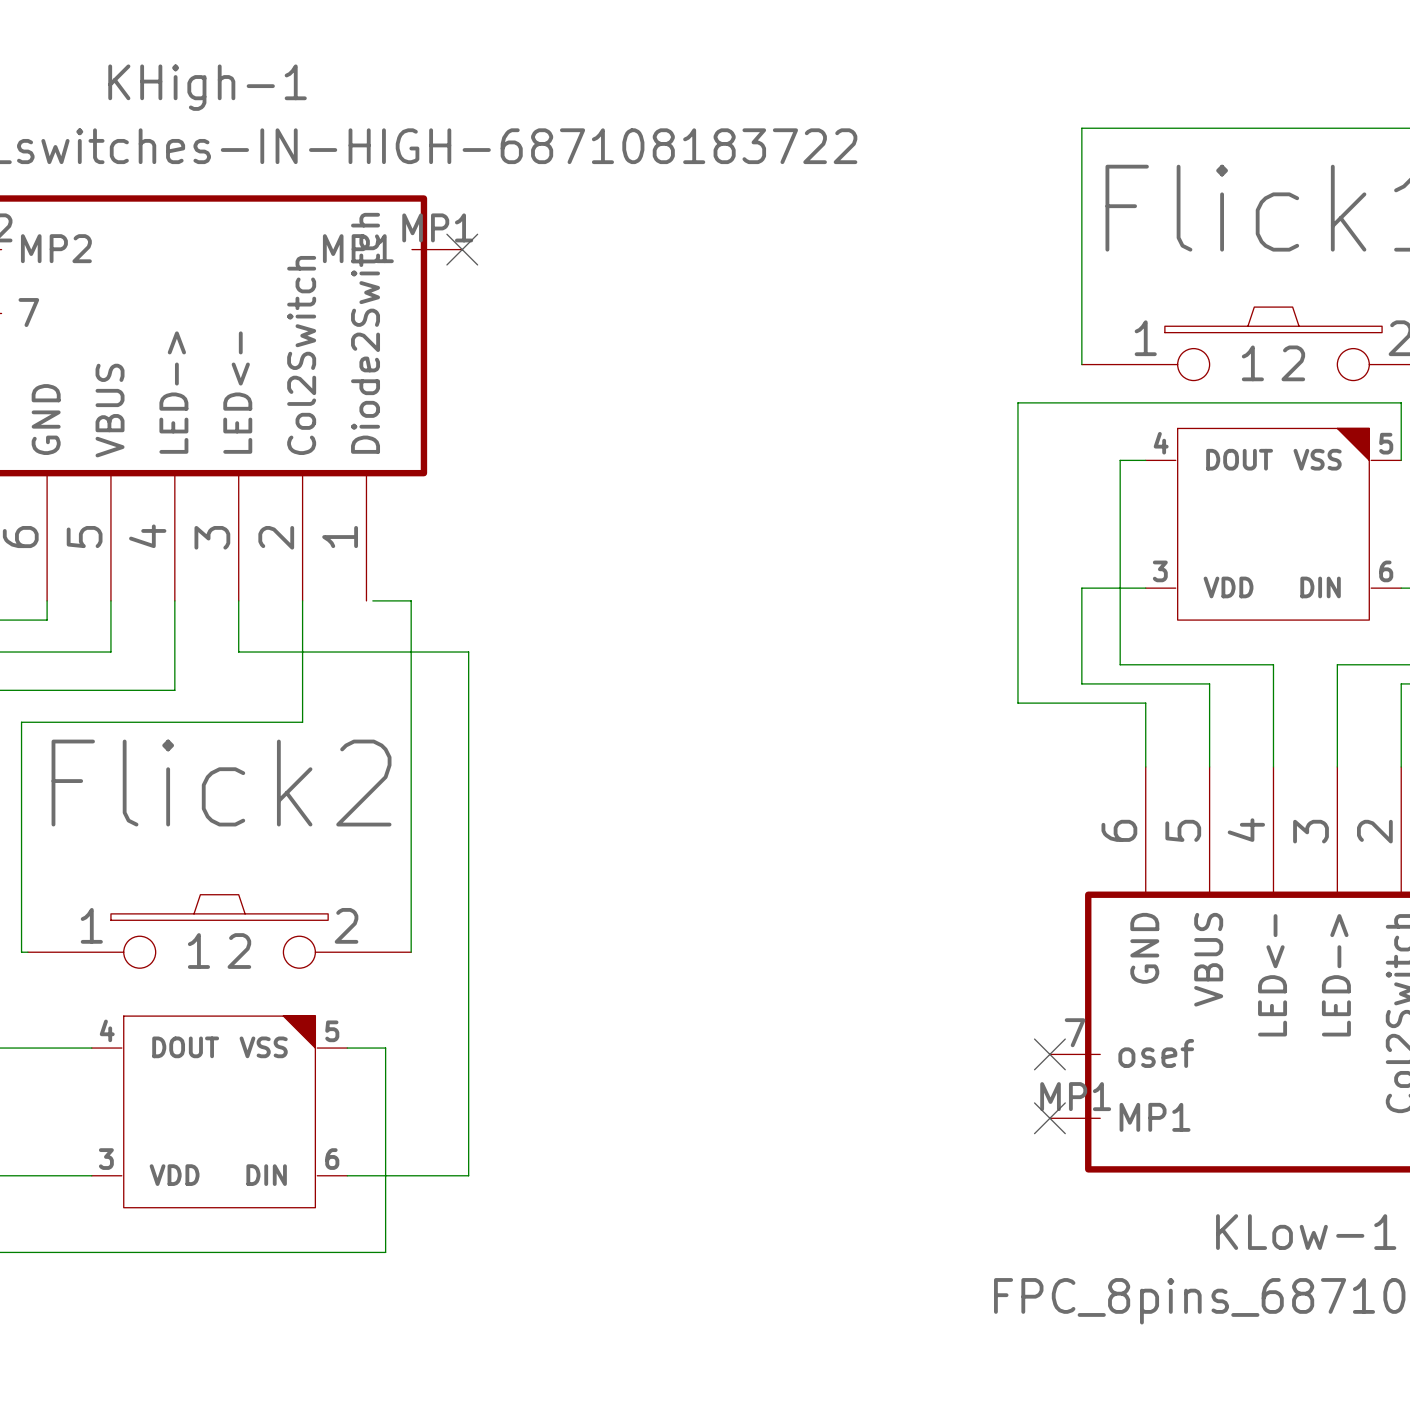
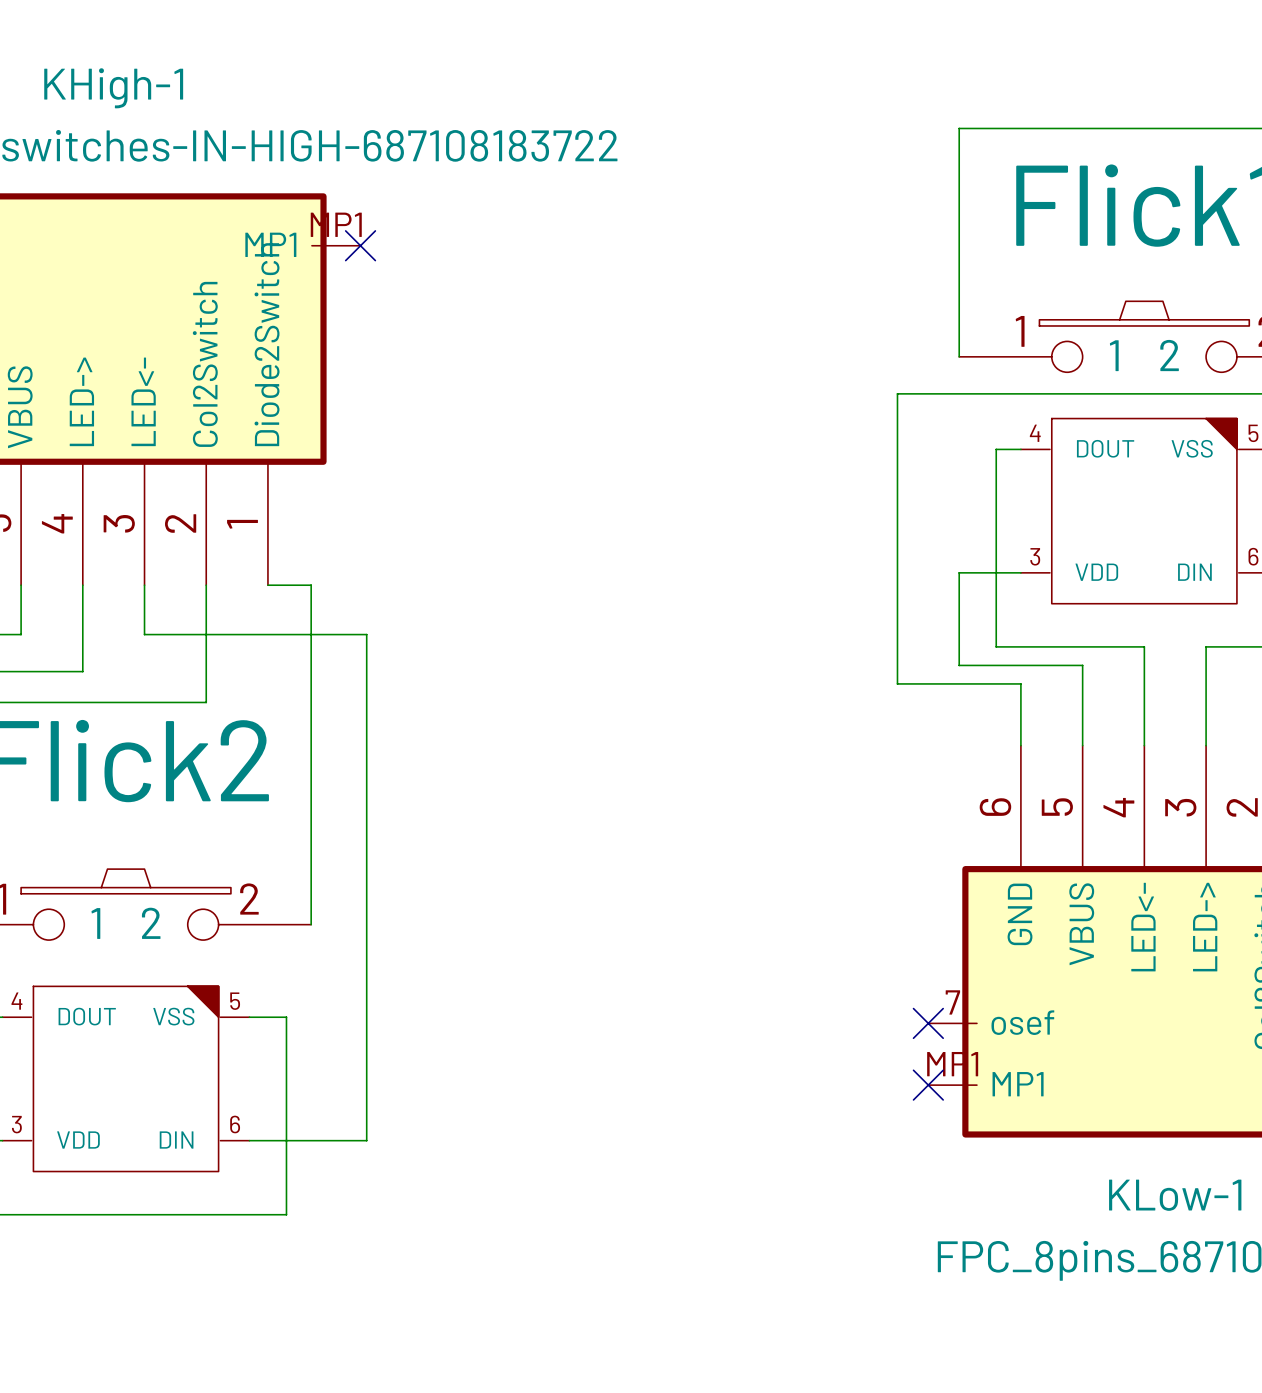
wire: none -> (267, 585) (274, 585)

